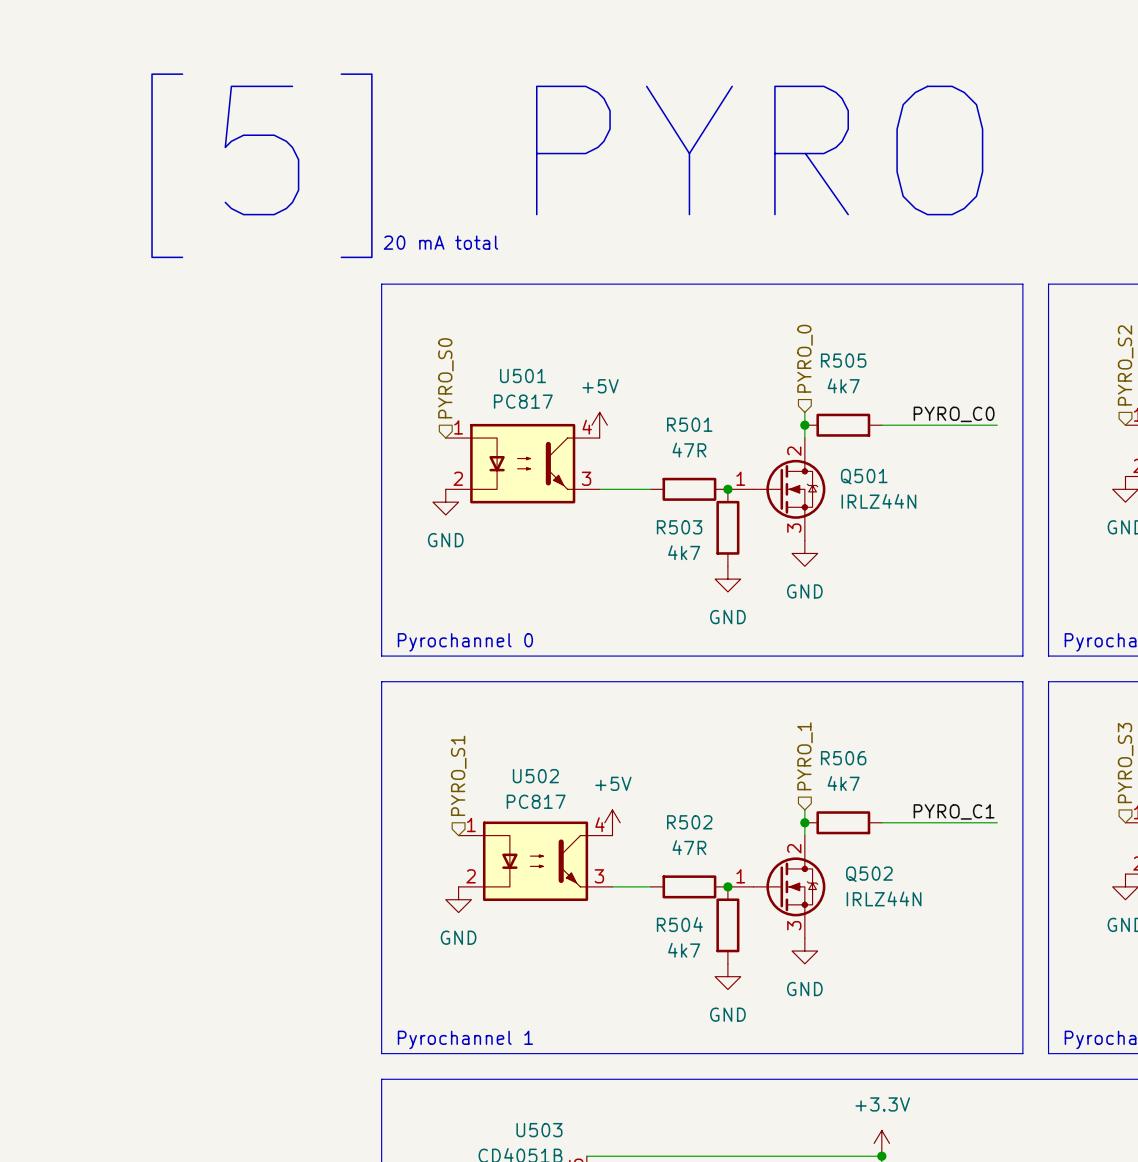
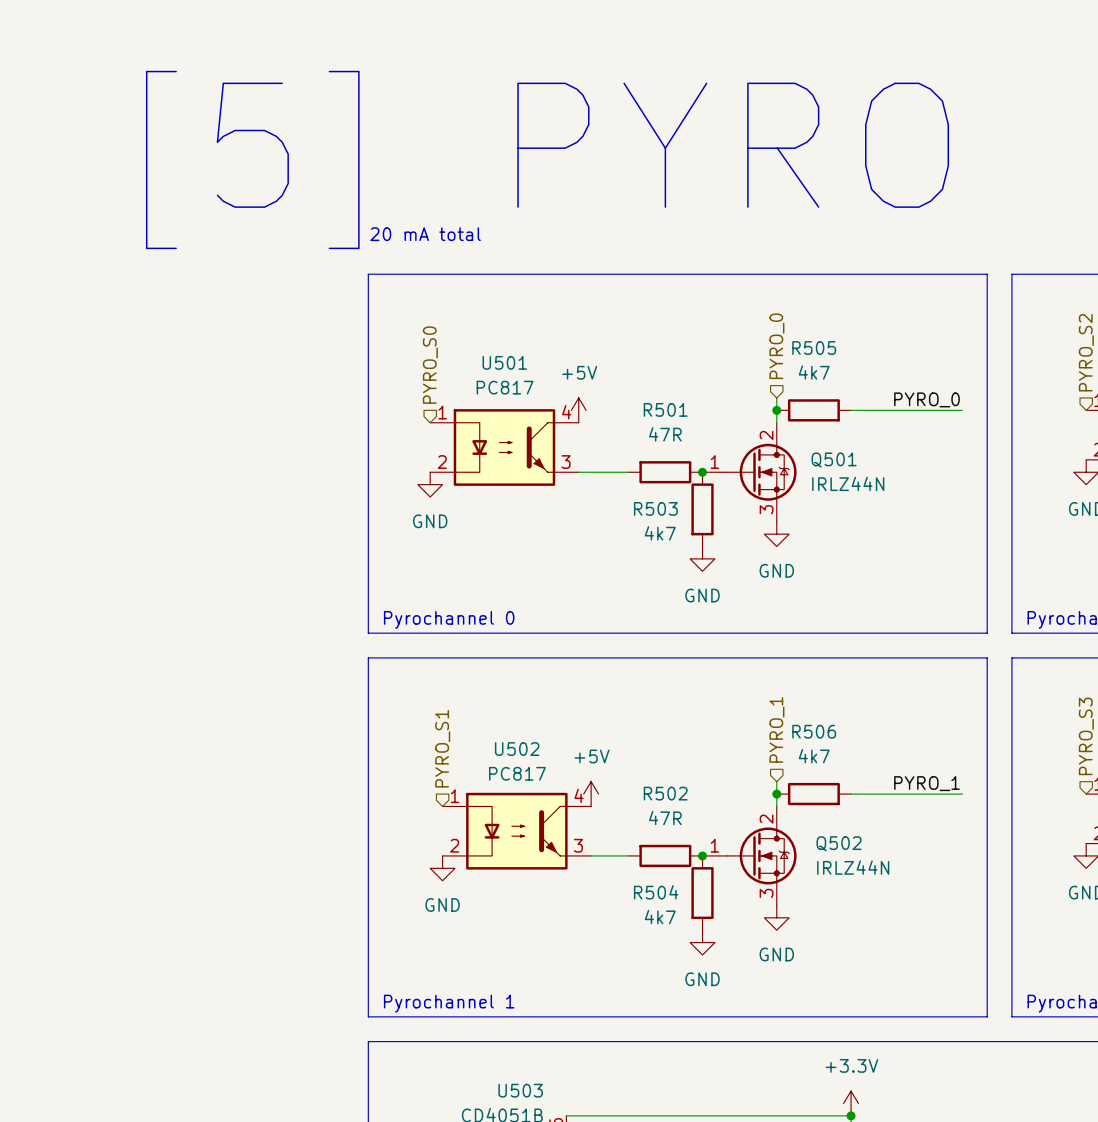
label: PYRO_C0 (954, 414) -> PYRO_0 (926, 399)
label: PYRO_C1 (954, 811) -> PYRO_1 (926, 783)

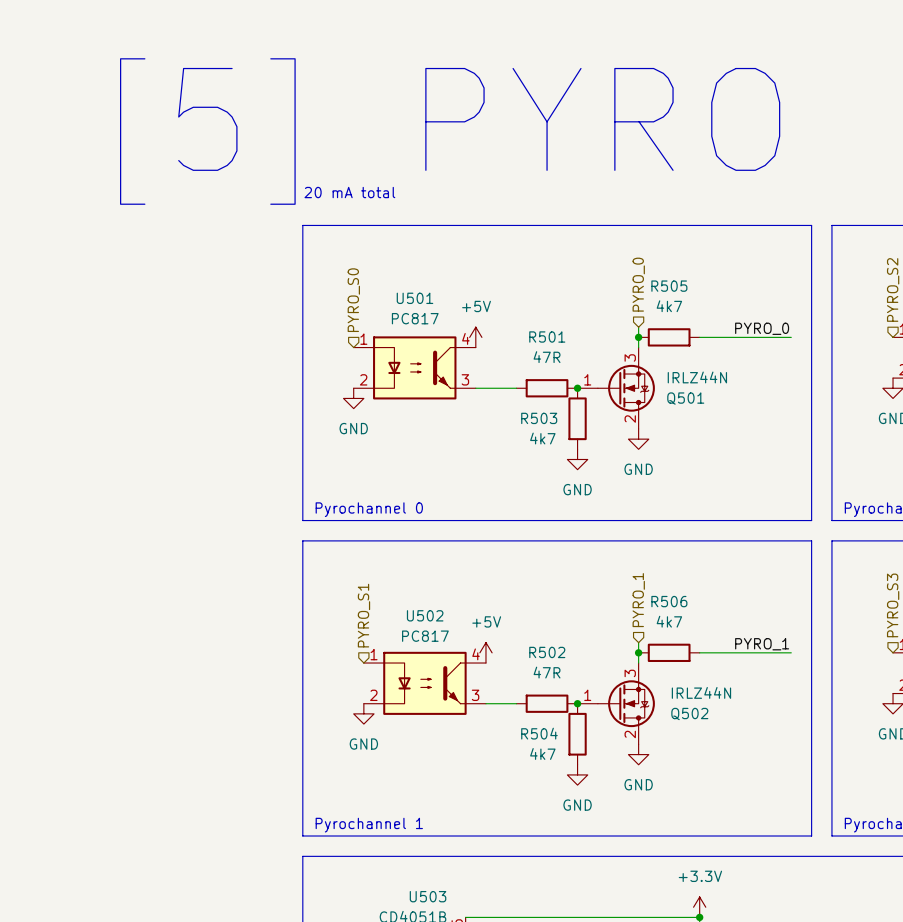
Q501 flip: as is (761, 472) -> up-down (626, 388)
Q502 flip: as is (761, 855) -> up-down (626, 703)

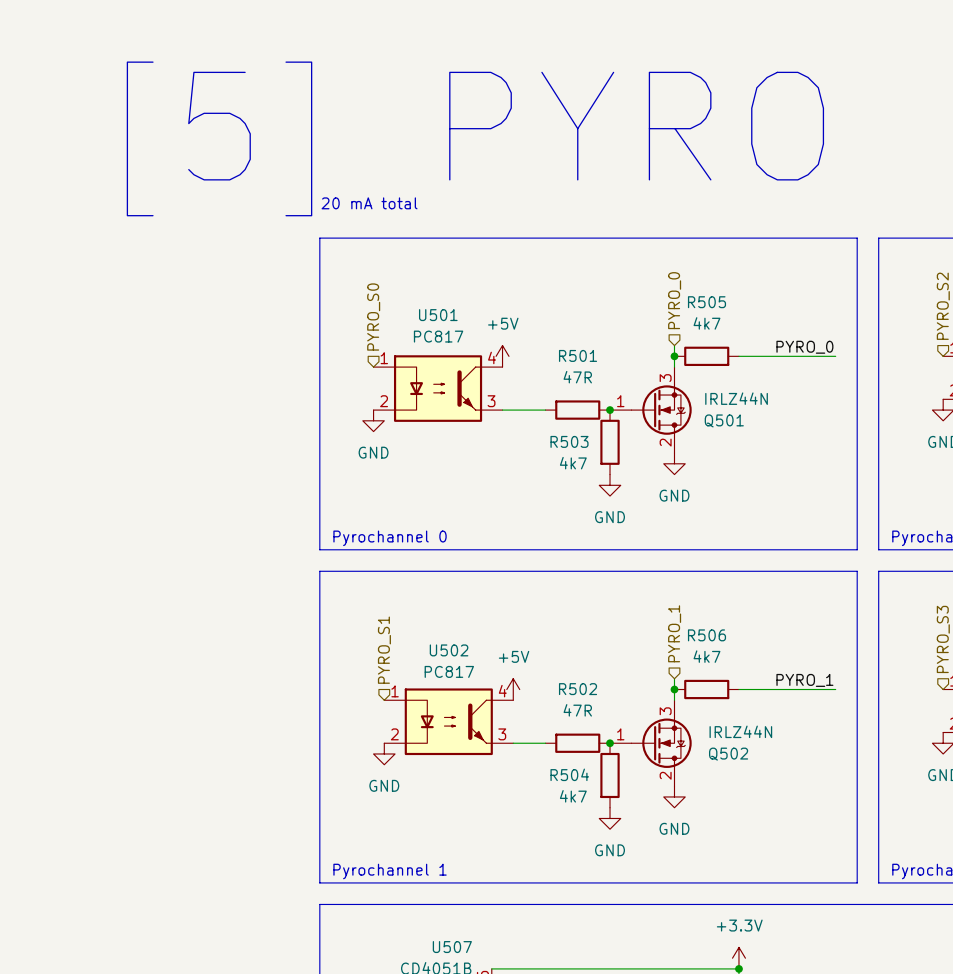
U503 name: U503 (428, 896) -> U507 (452, 947)

